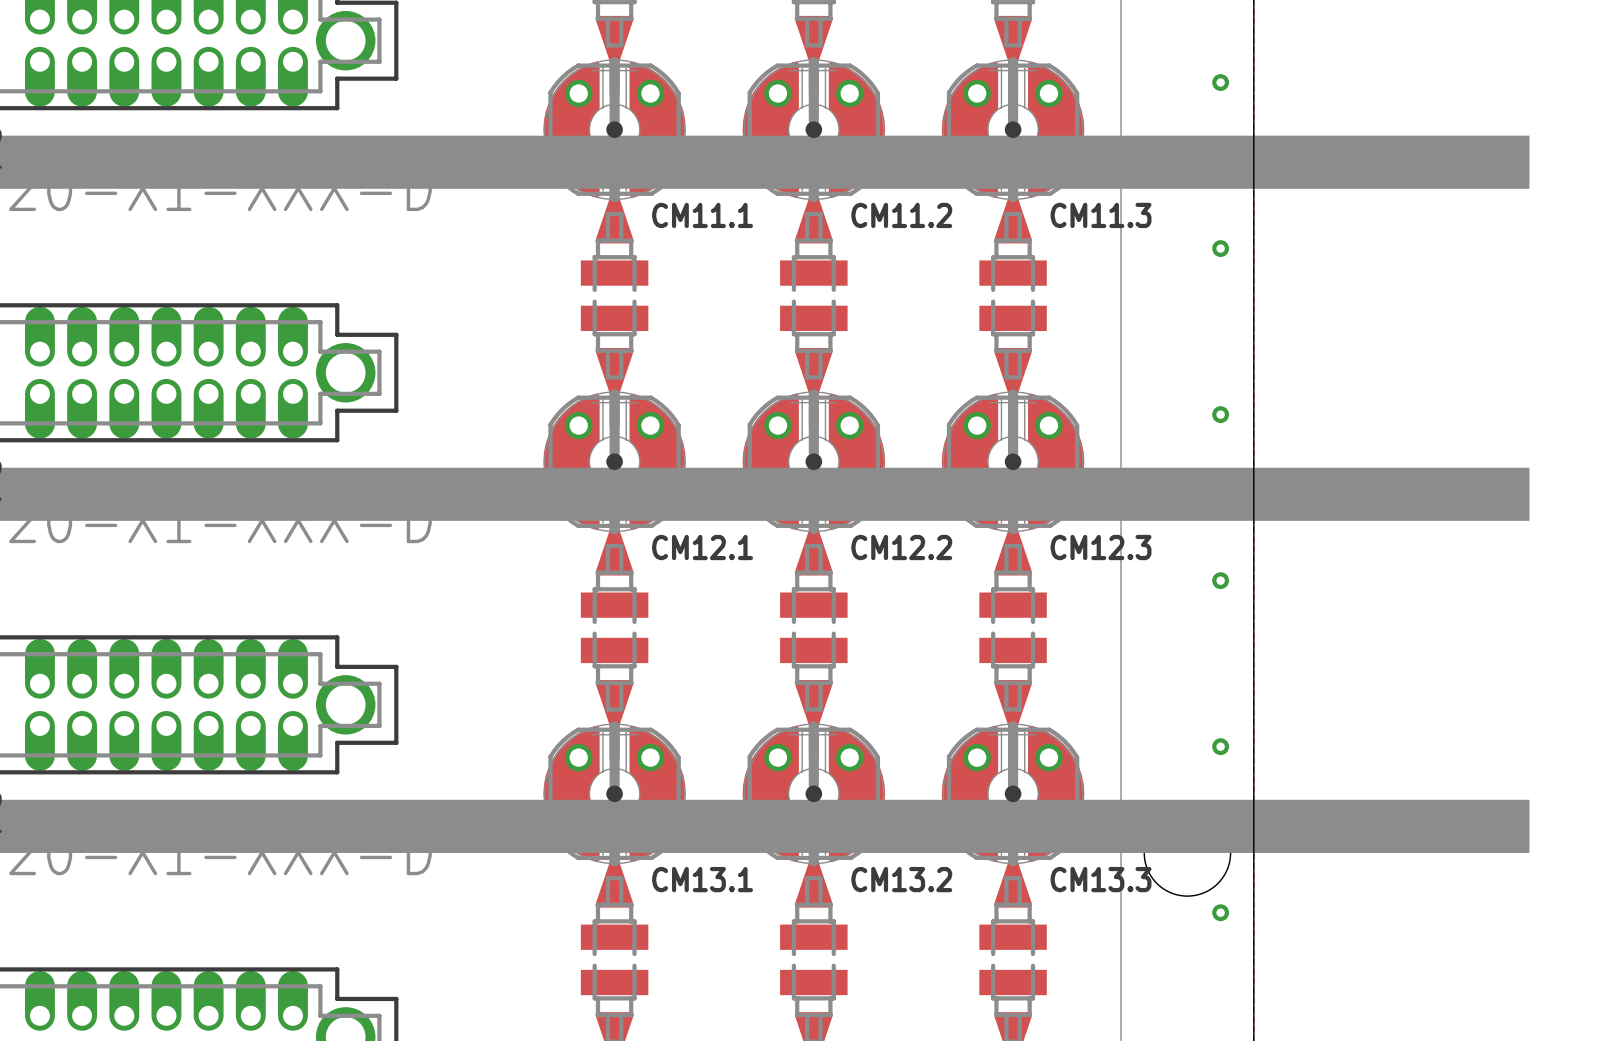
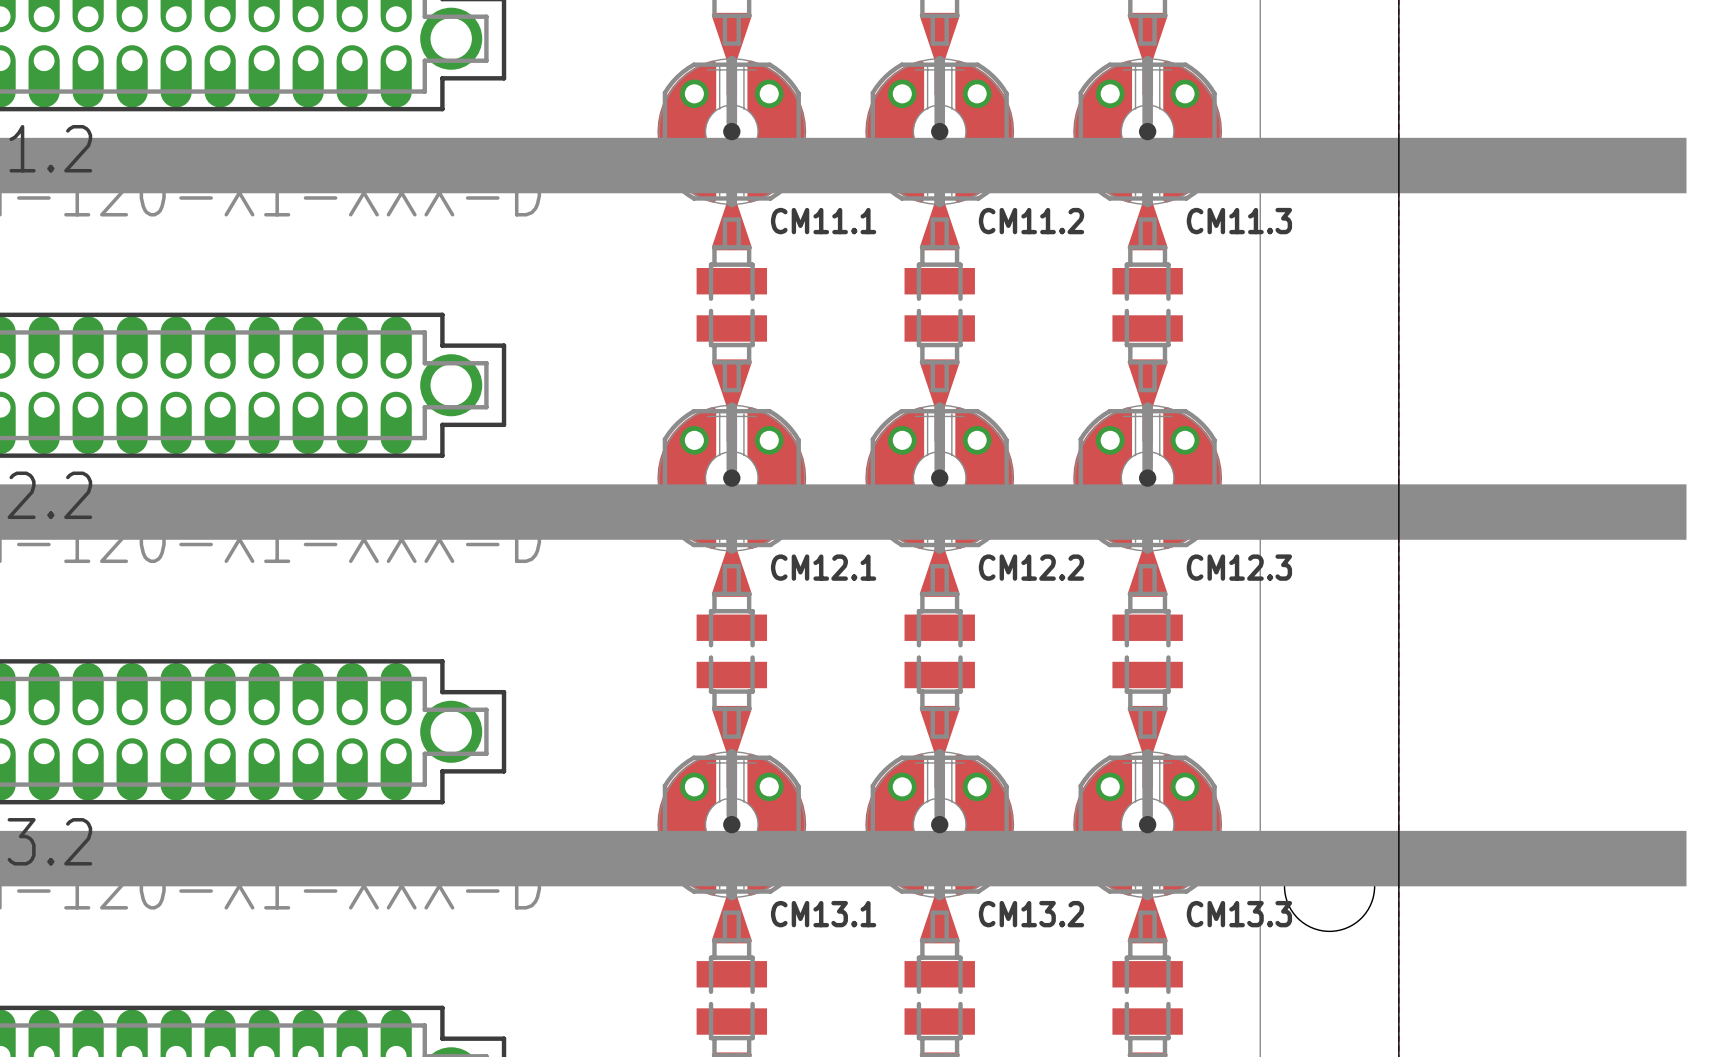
via: (1220, 82) -> none
via: (1220, 248) -> none
via: (1220, 414) -> none
via: (1220, 580) -> none
via: (1220, 746) -> none
via: (1220, 912) -> none

